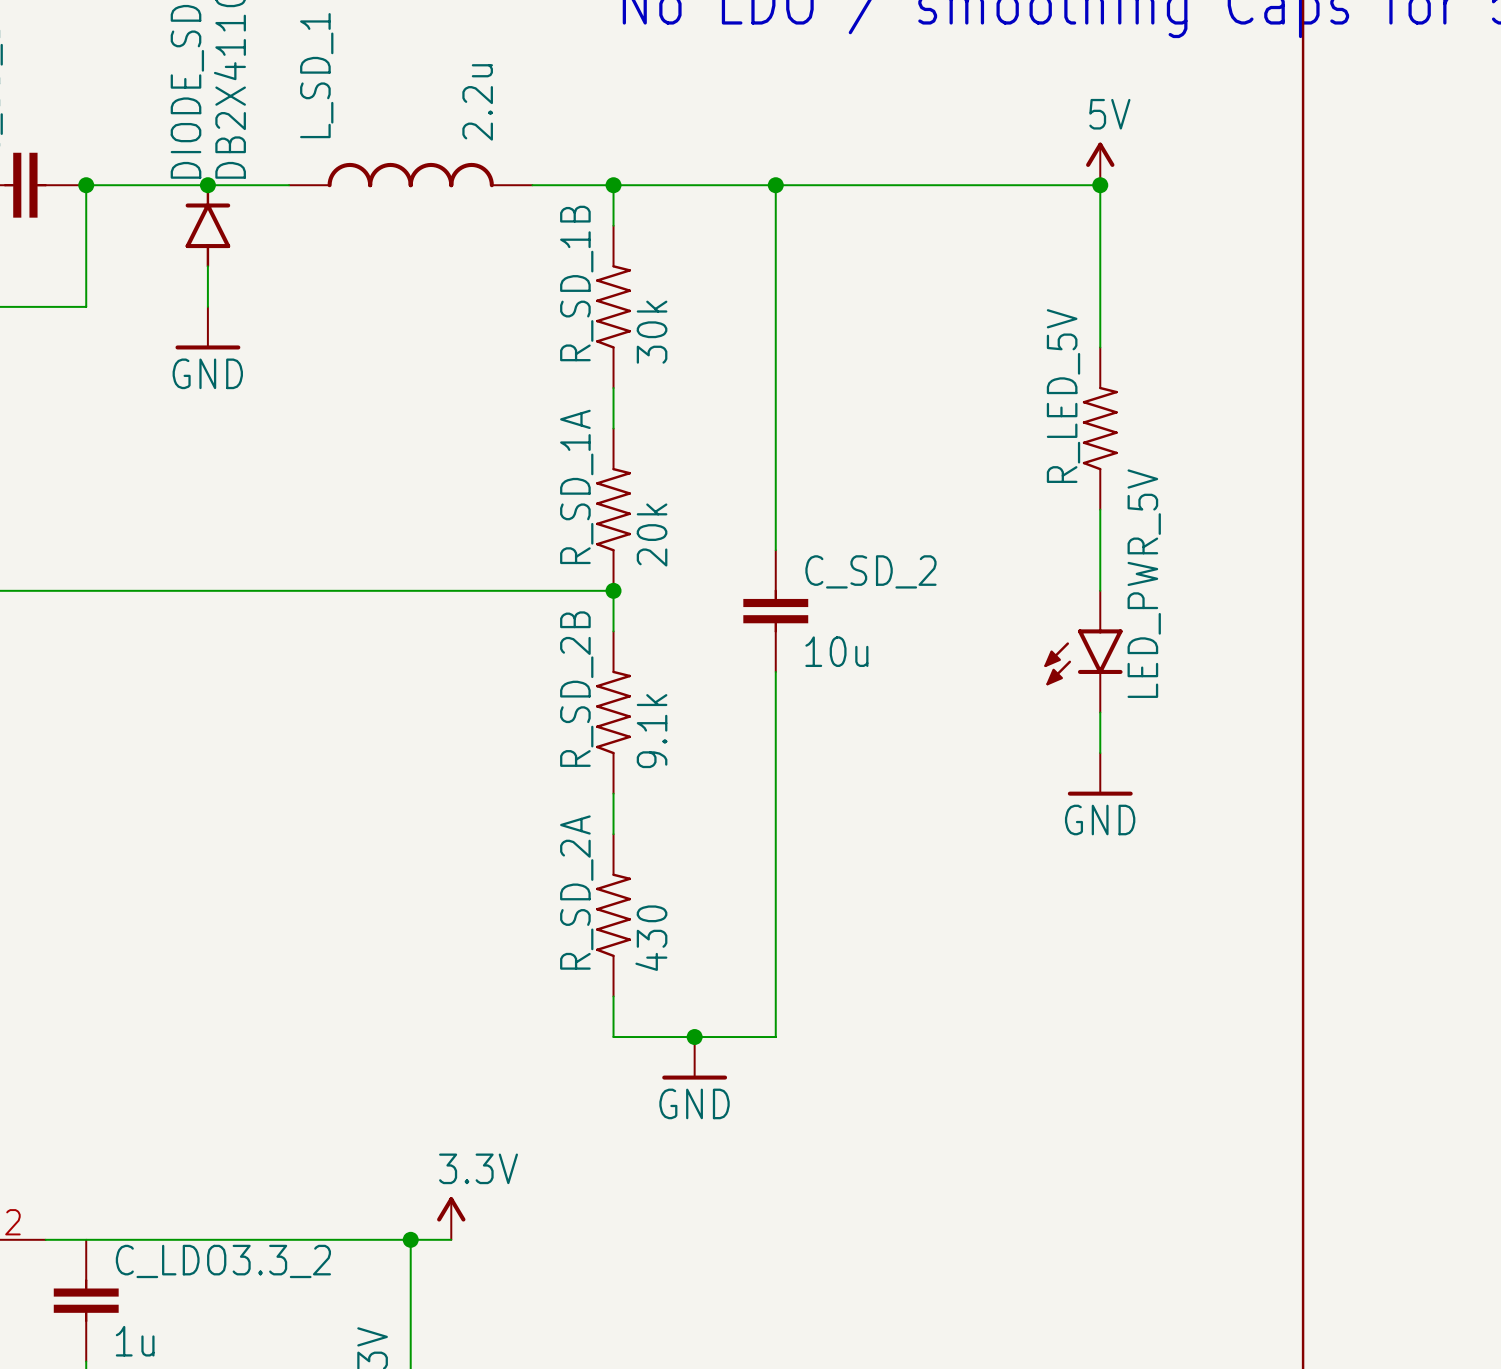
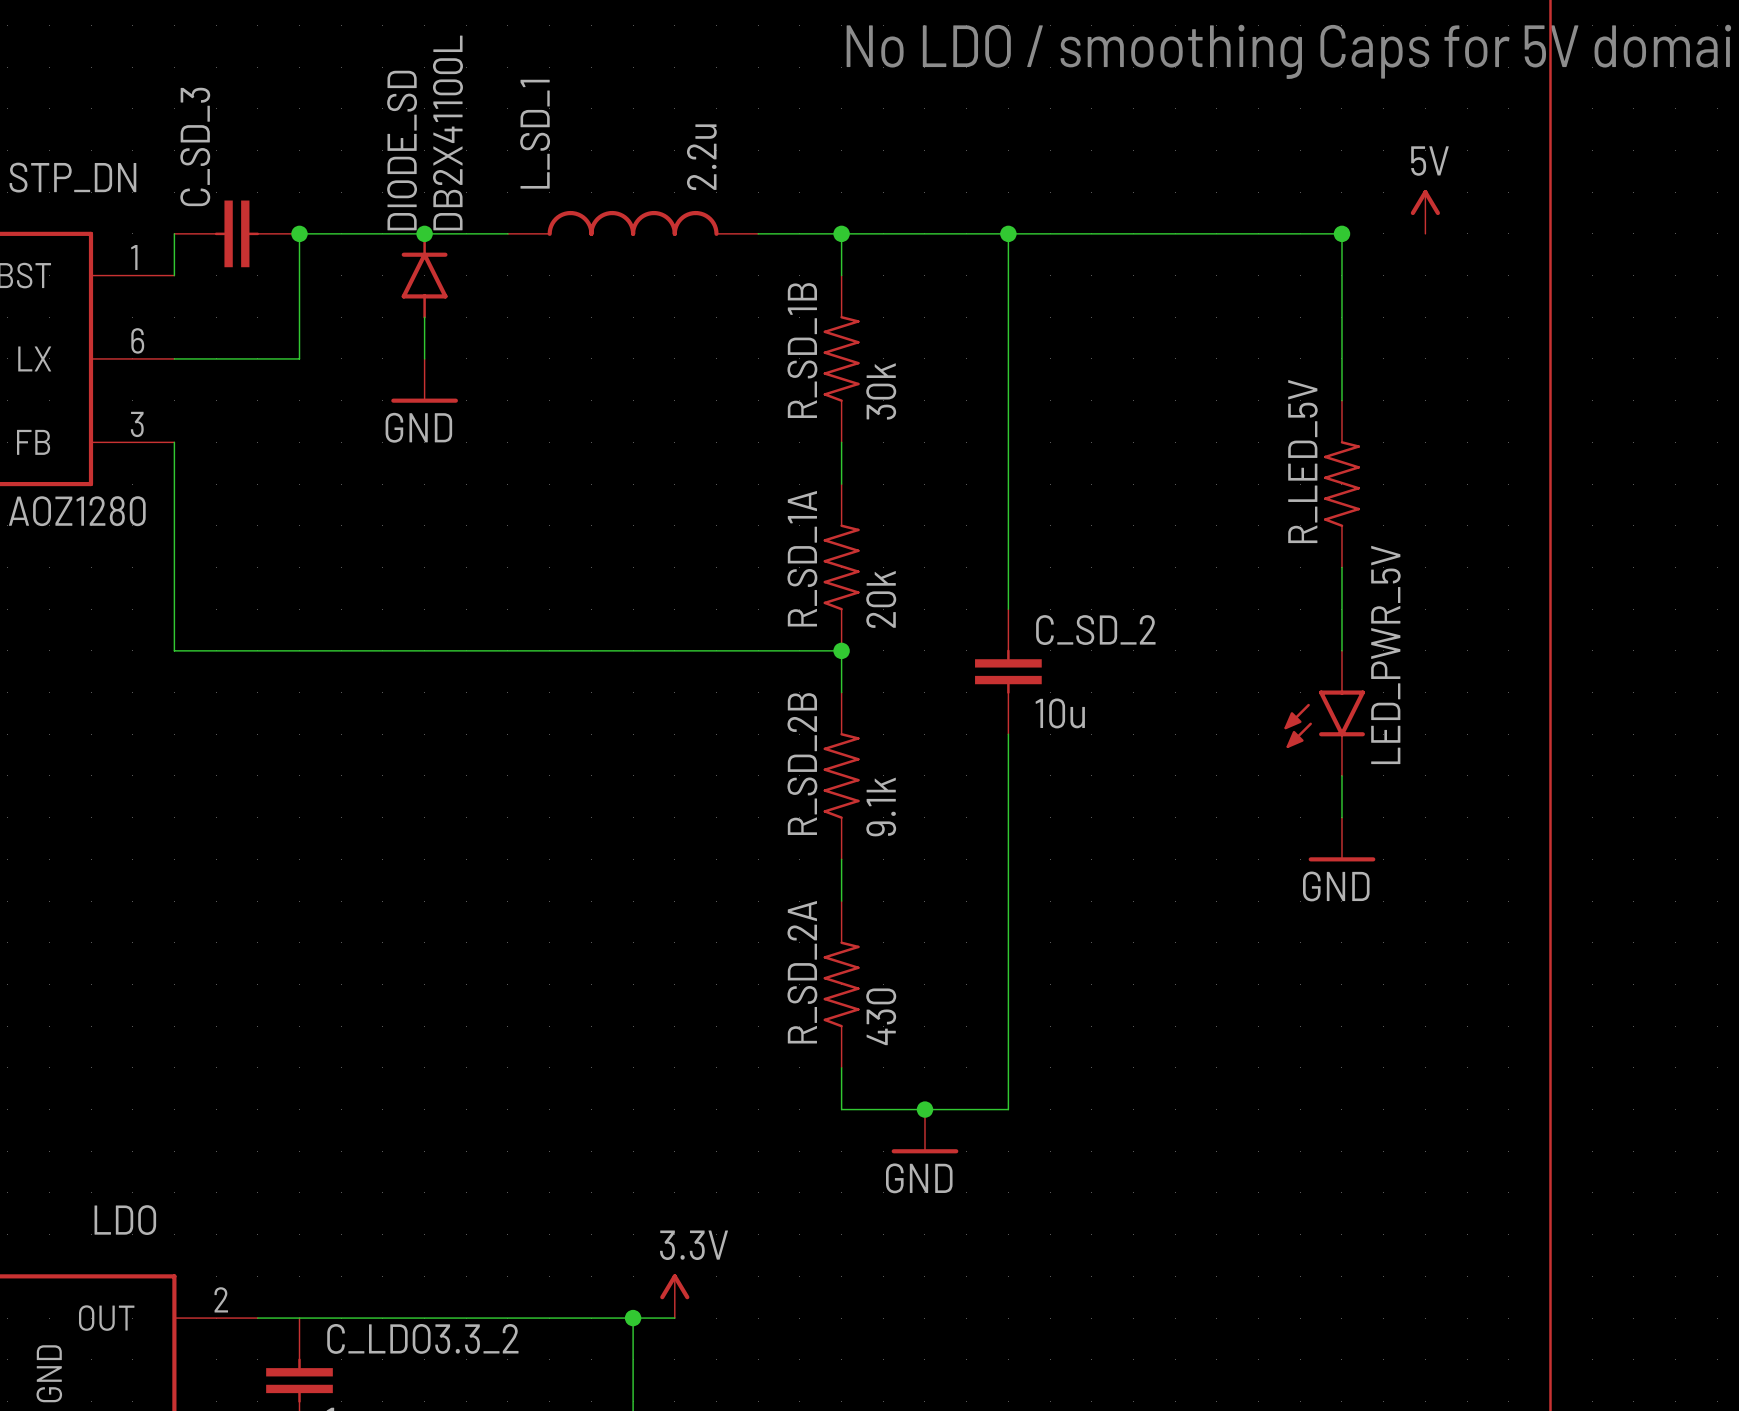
power symbol position: 5V (1100, 163) -> 5V (1425, 211)

